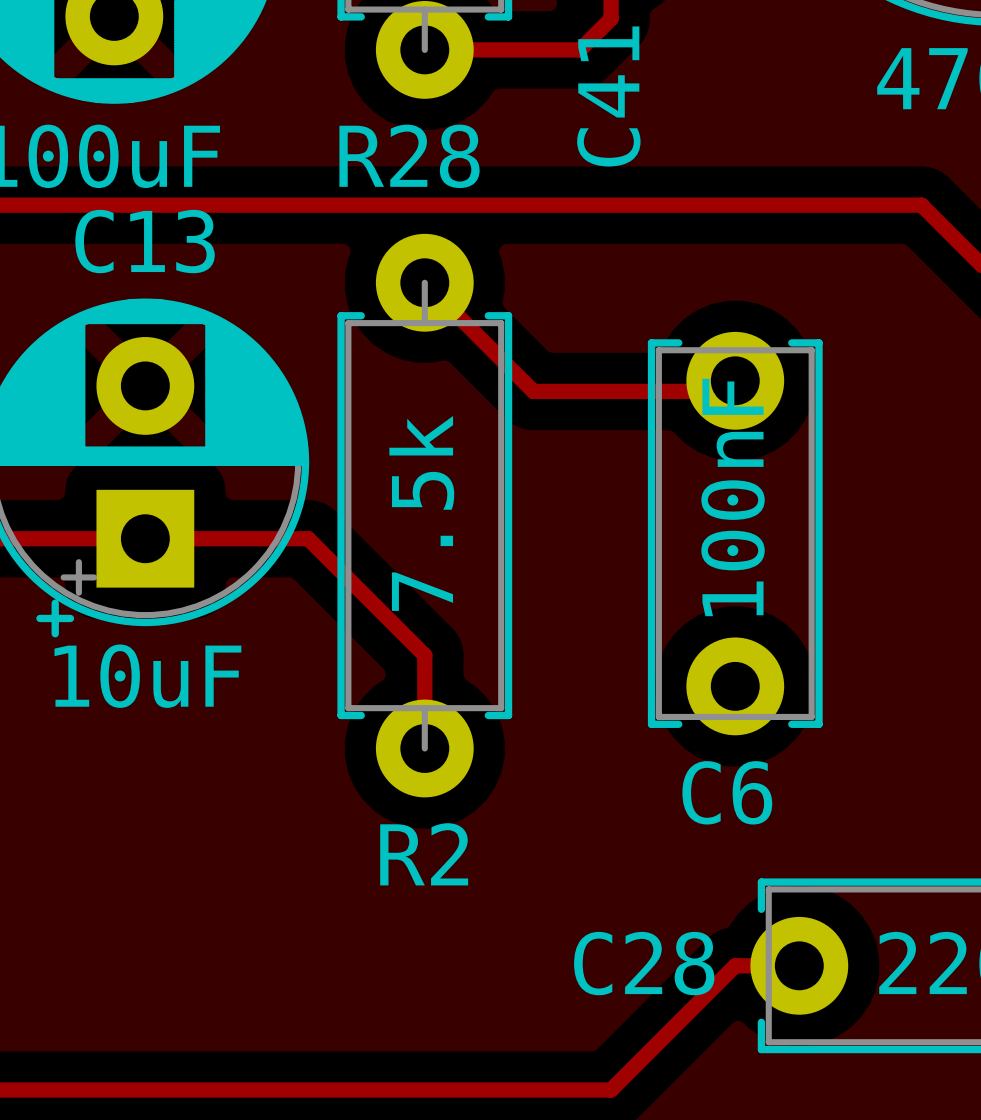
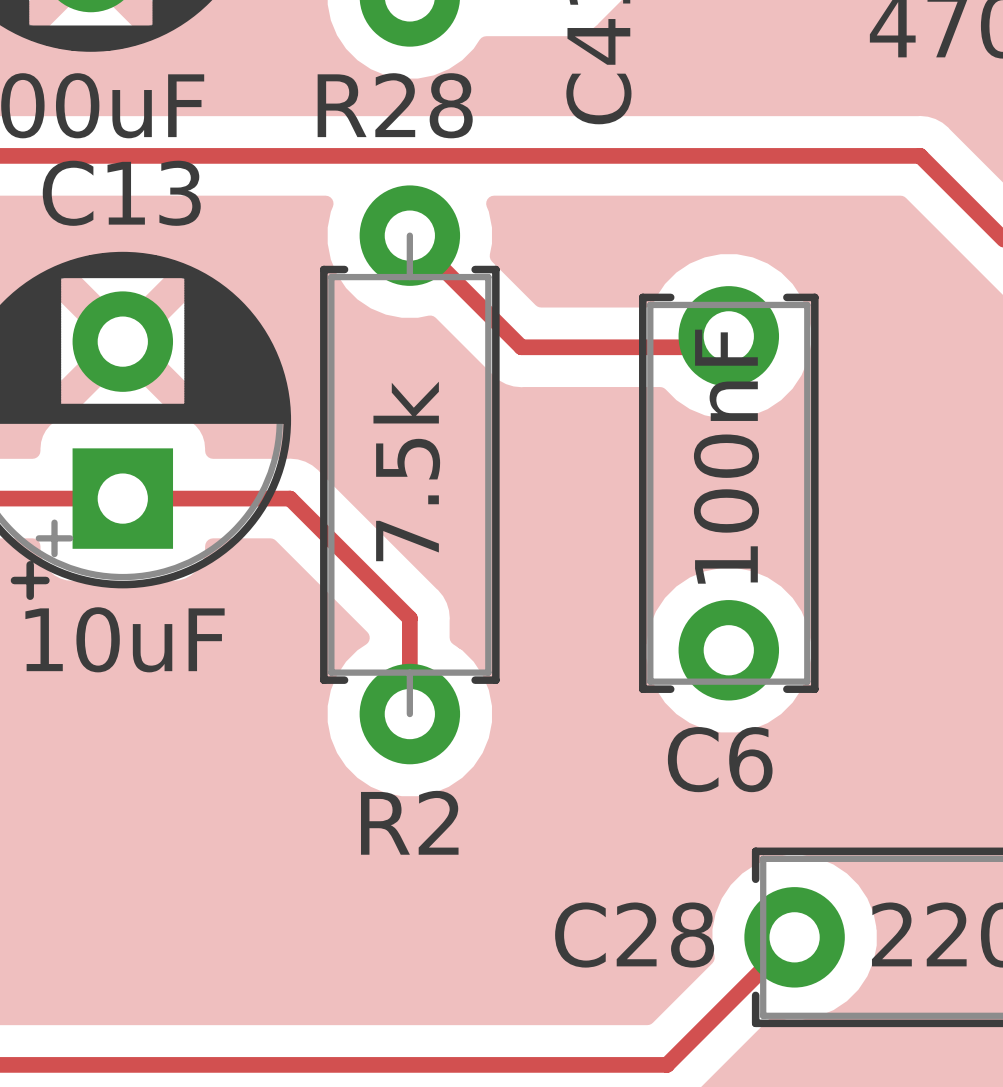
track: (799, 965) (735, 965) (611, 1090) -> (794, 937) (667, 1064) (601, 1064)

